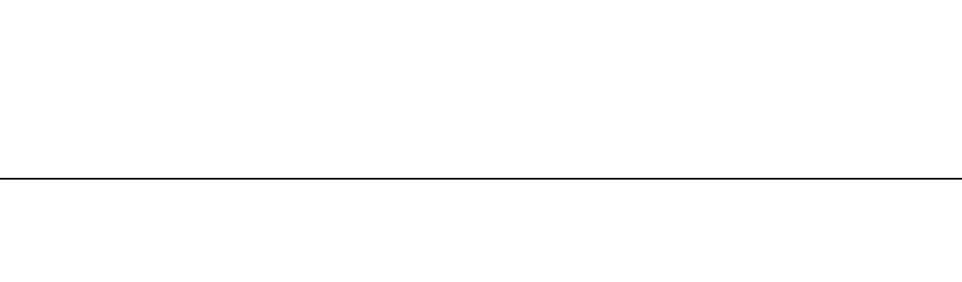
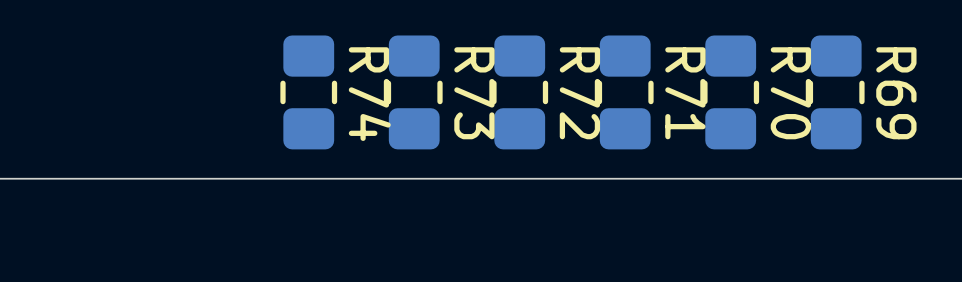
R74: none -> (308, 92)
R73: none -> (414, 92)
R72: none -> (519, 92)
R71: none -> (625, 92)
R70: none -> (730, 92)
R69: none -> (836, 92)

